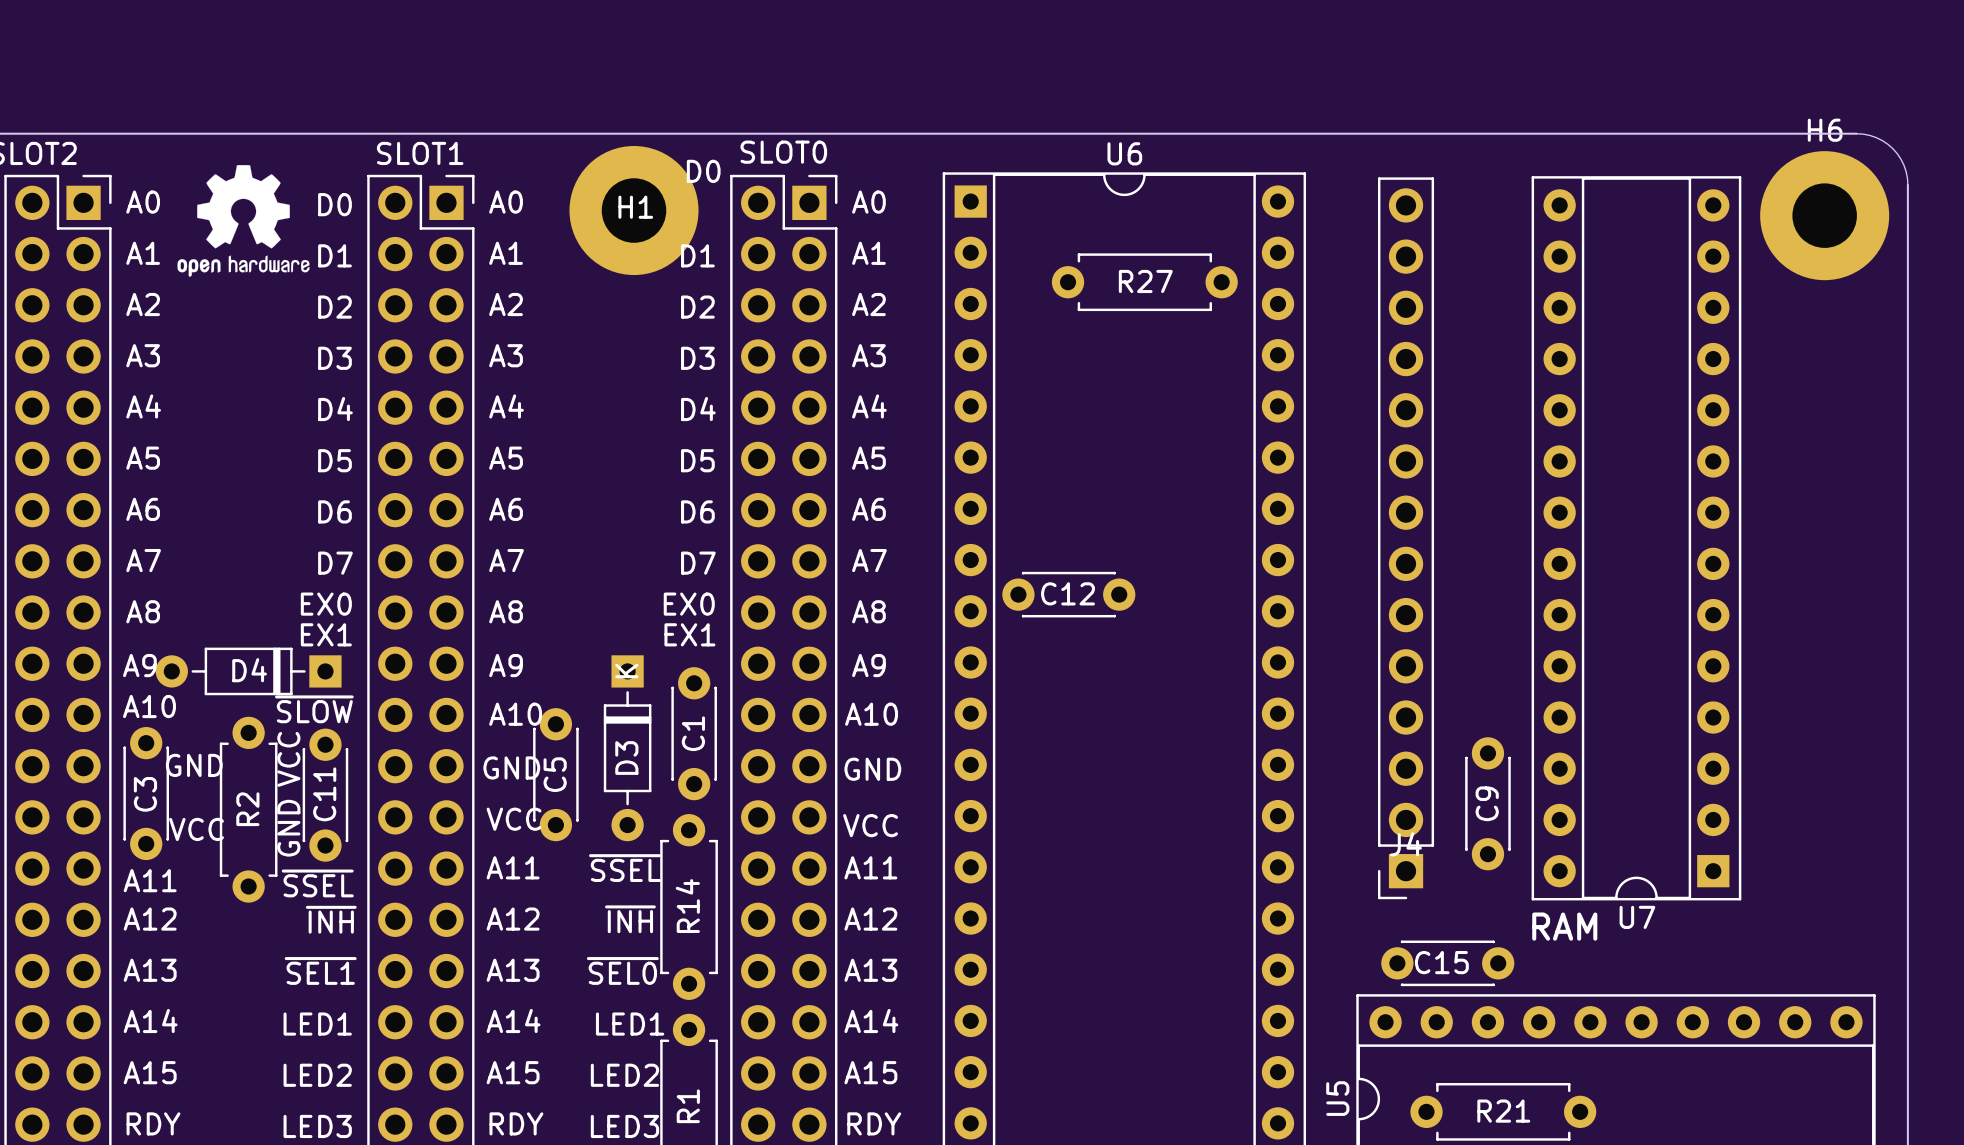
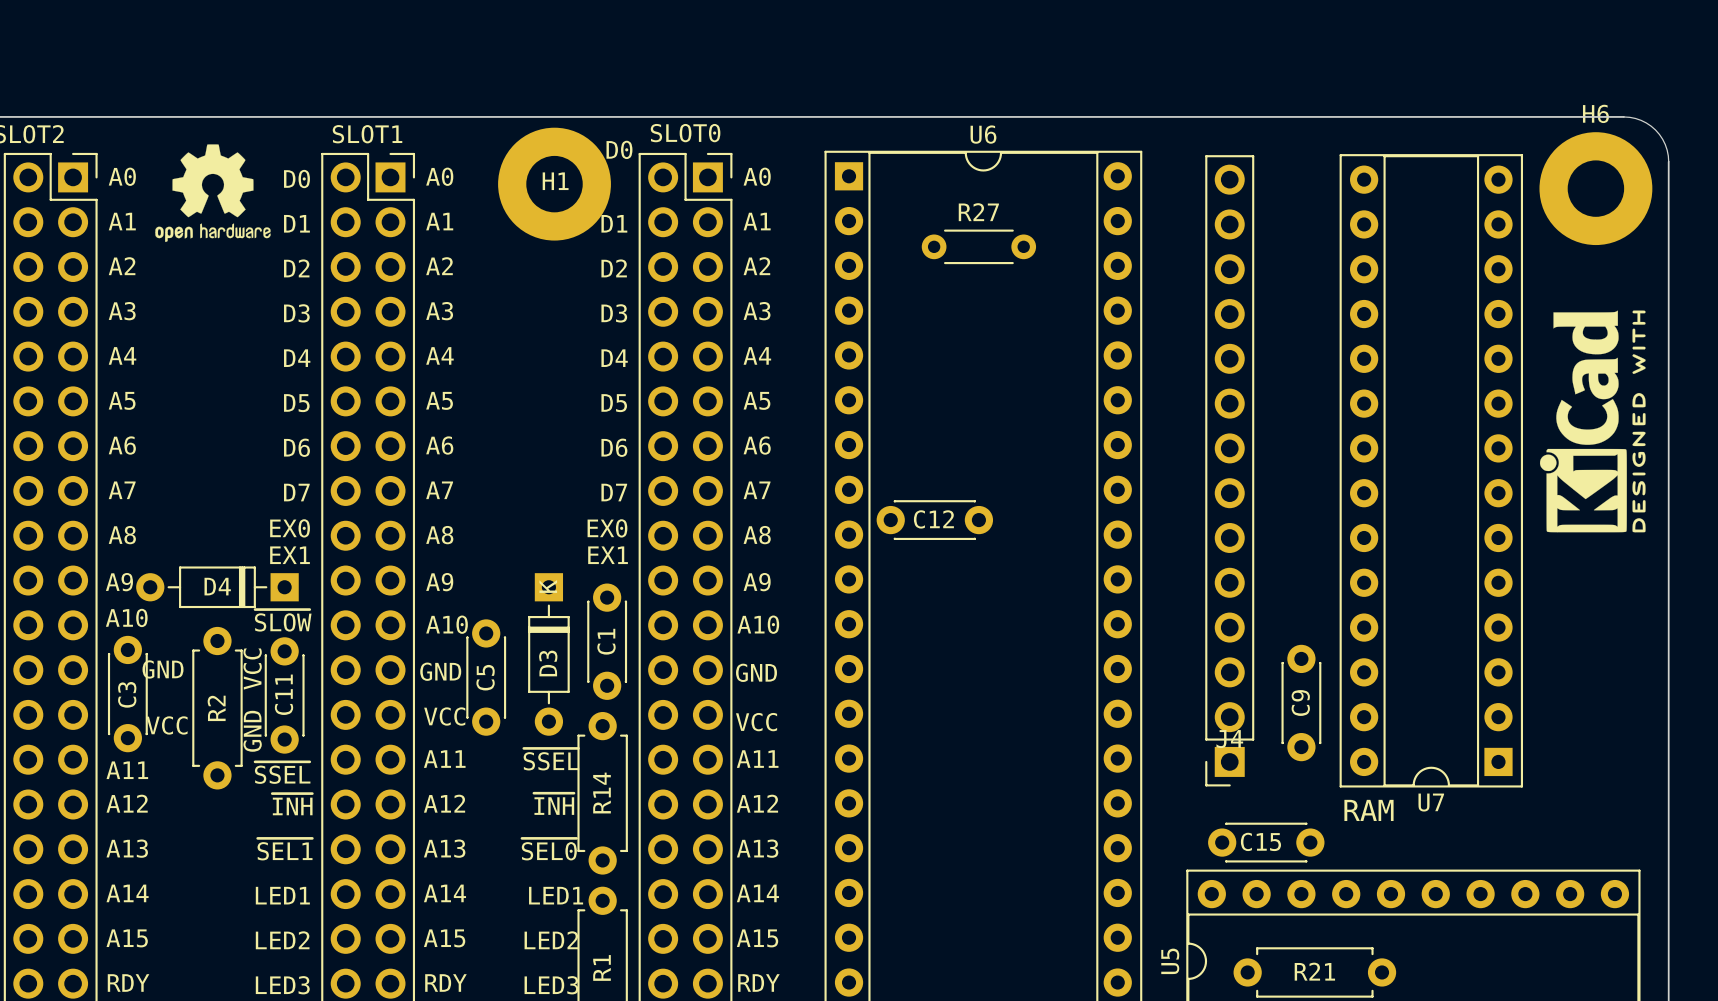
R27 footprint: [1051, 253, 1238, 312] -> [921, 229, 1037, 265]
drawing: none -> [1539, 310, 1646, 533]

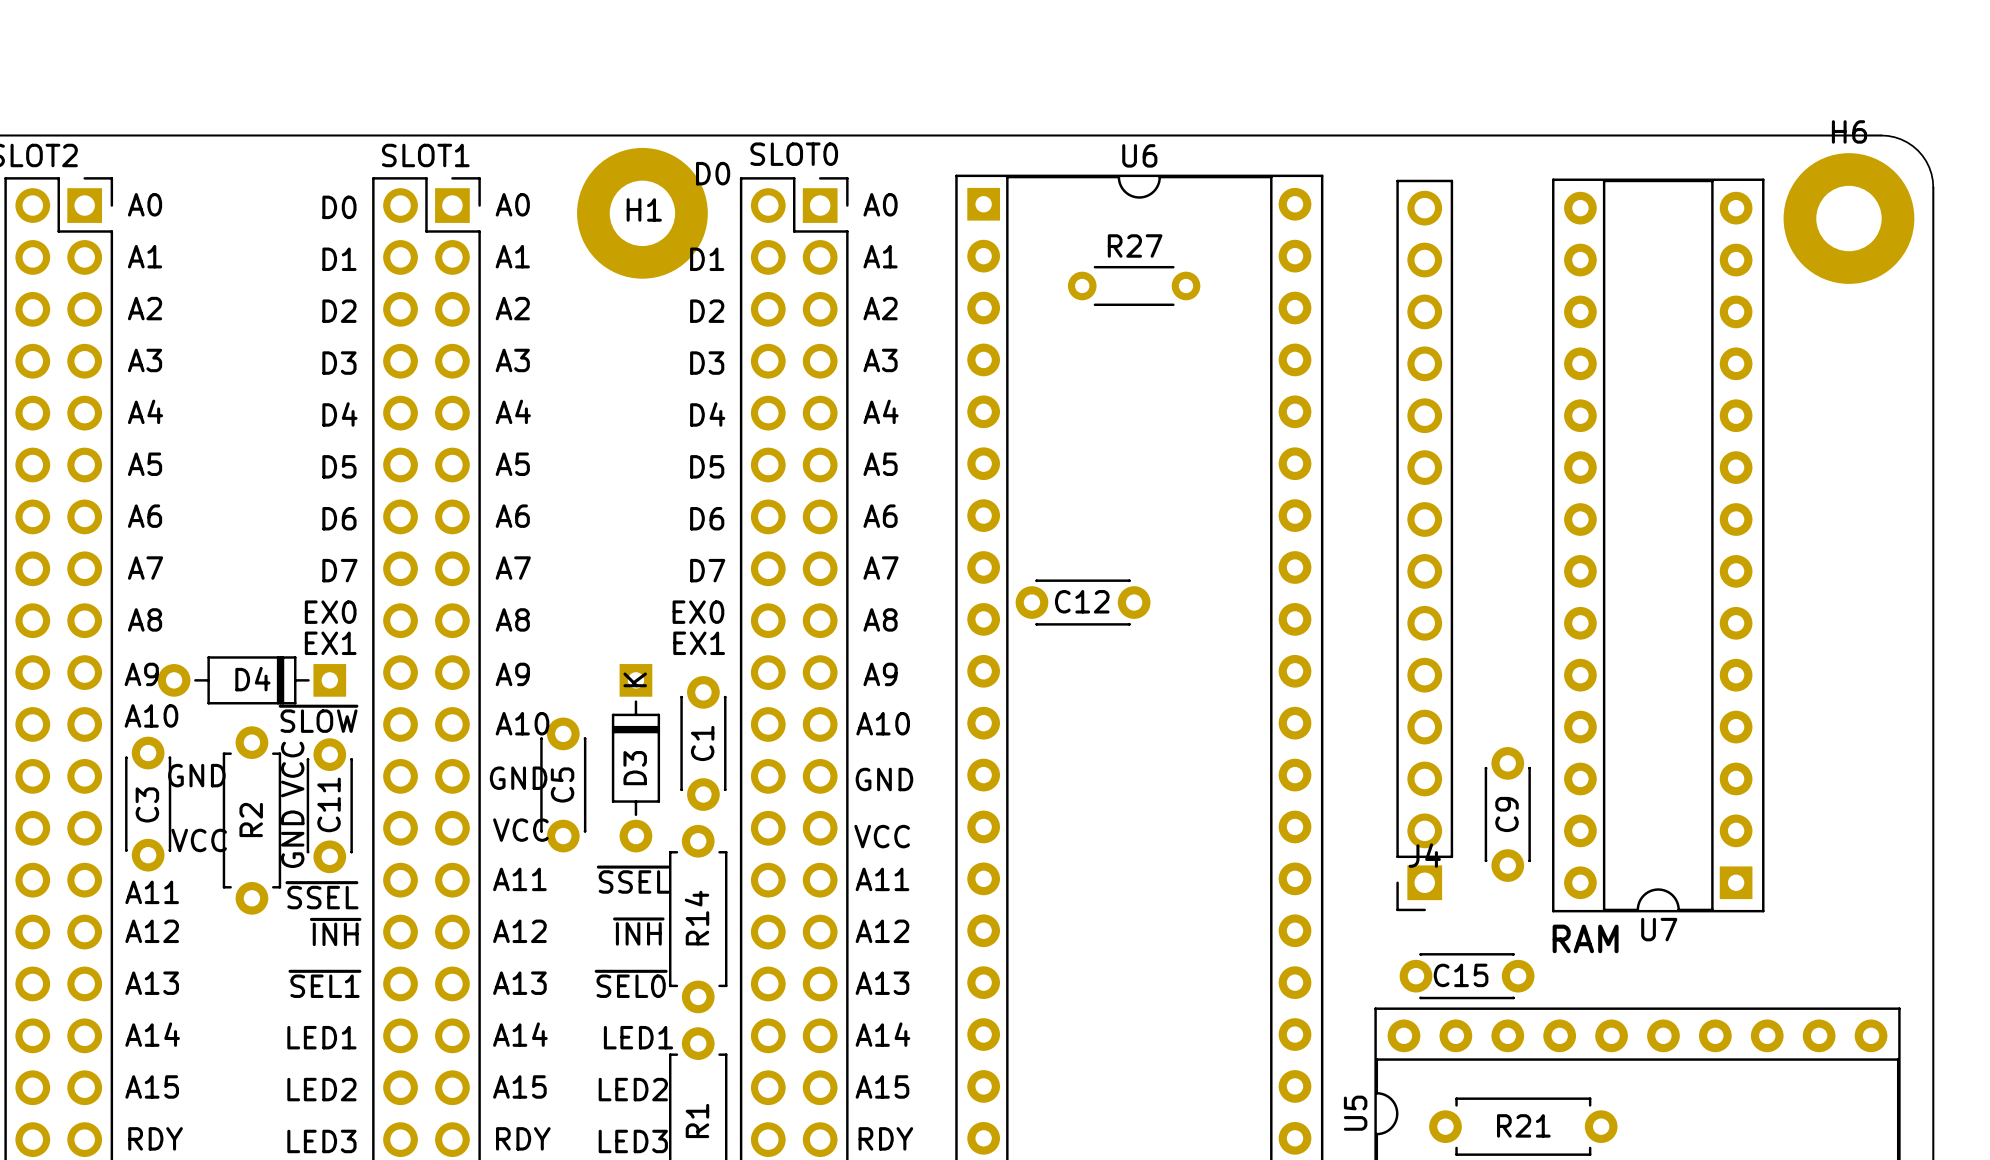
drawing: [155, 144, 271, 243] -> none
drawing: [1539, 310, 1646, 533] -> none

